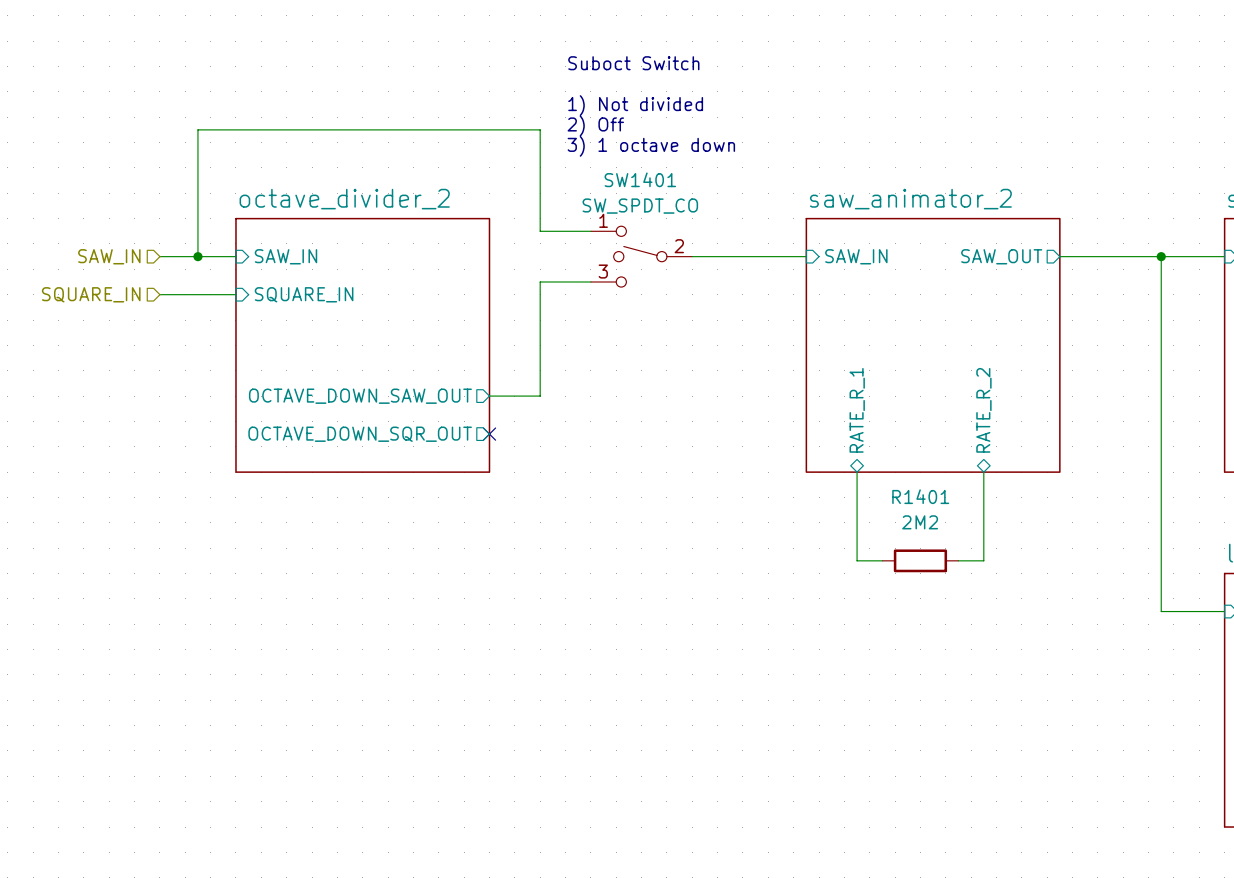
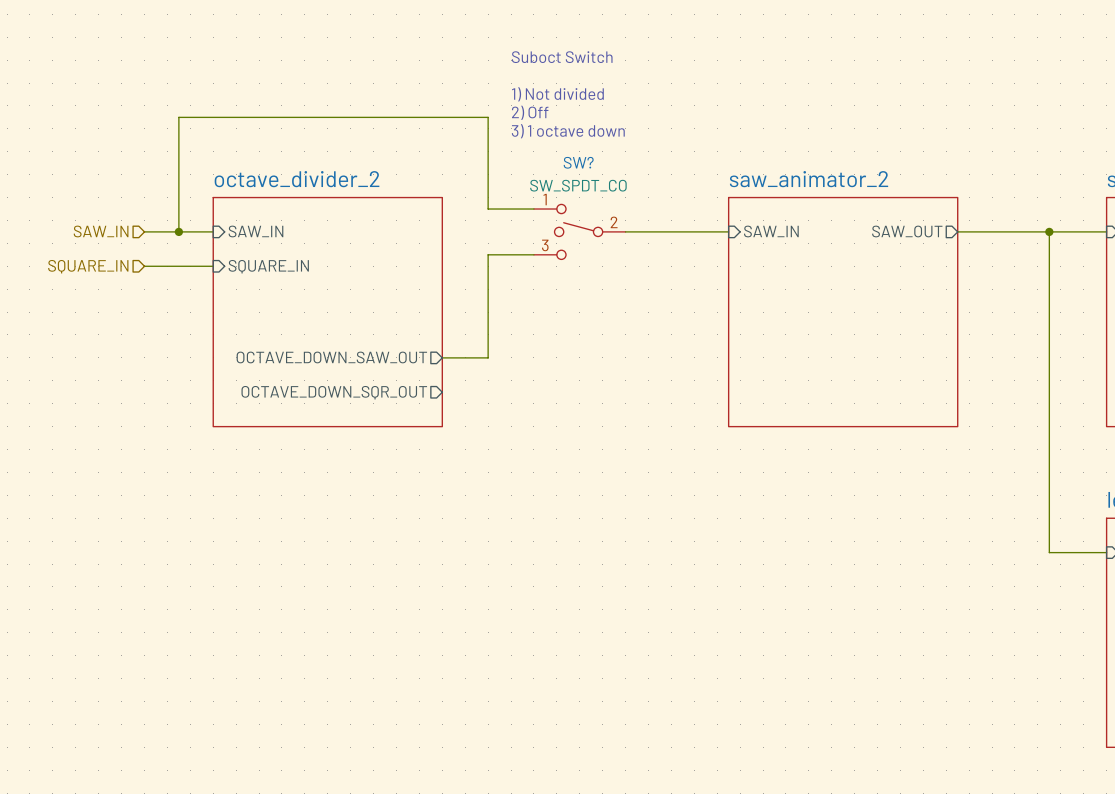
SW1401 name: SW1401 (640, 179) -> SW? (578, 162)
sheet pin: RATE_R_1 (857, 410) -> none
sheet pin: RATE_R_2 (983, 410) -> none
no-connect mark: (489, 434) -> none
wire: (857, 472) (857, 560) (882, 560) -> none
wire: (983, 472) (983, 560) (958, 560) -> none
R1401: 2M2 (920, 560) -> none

